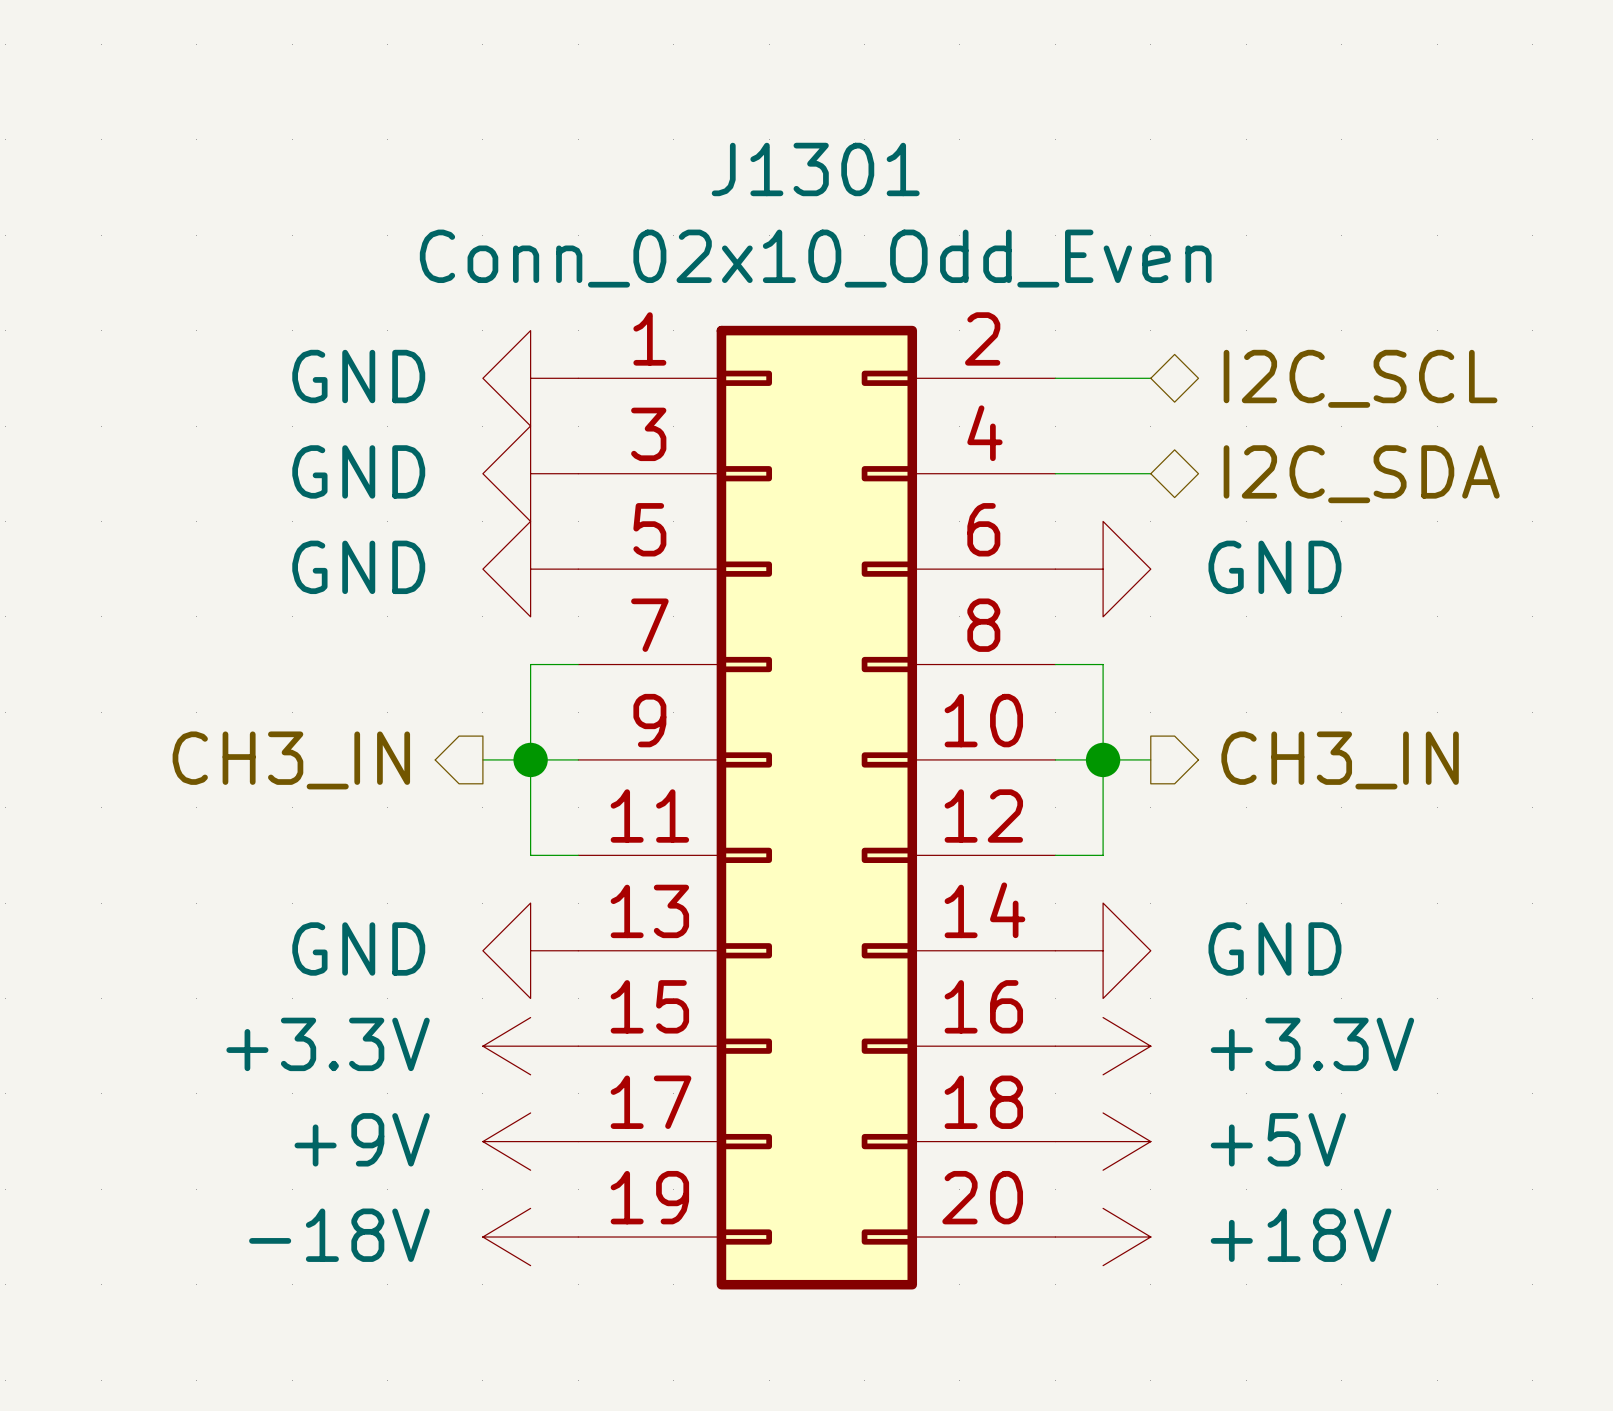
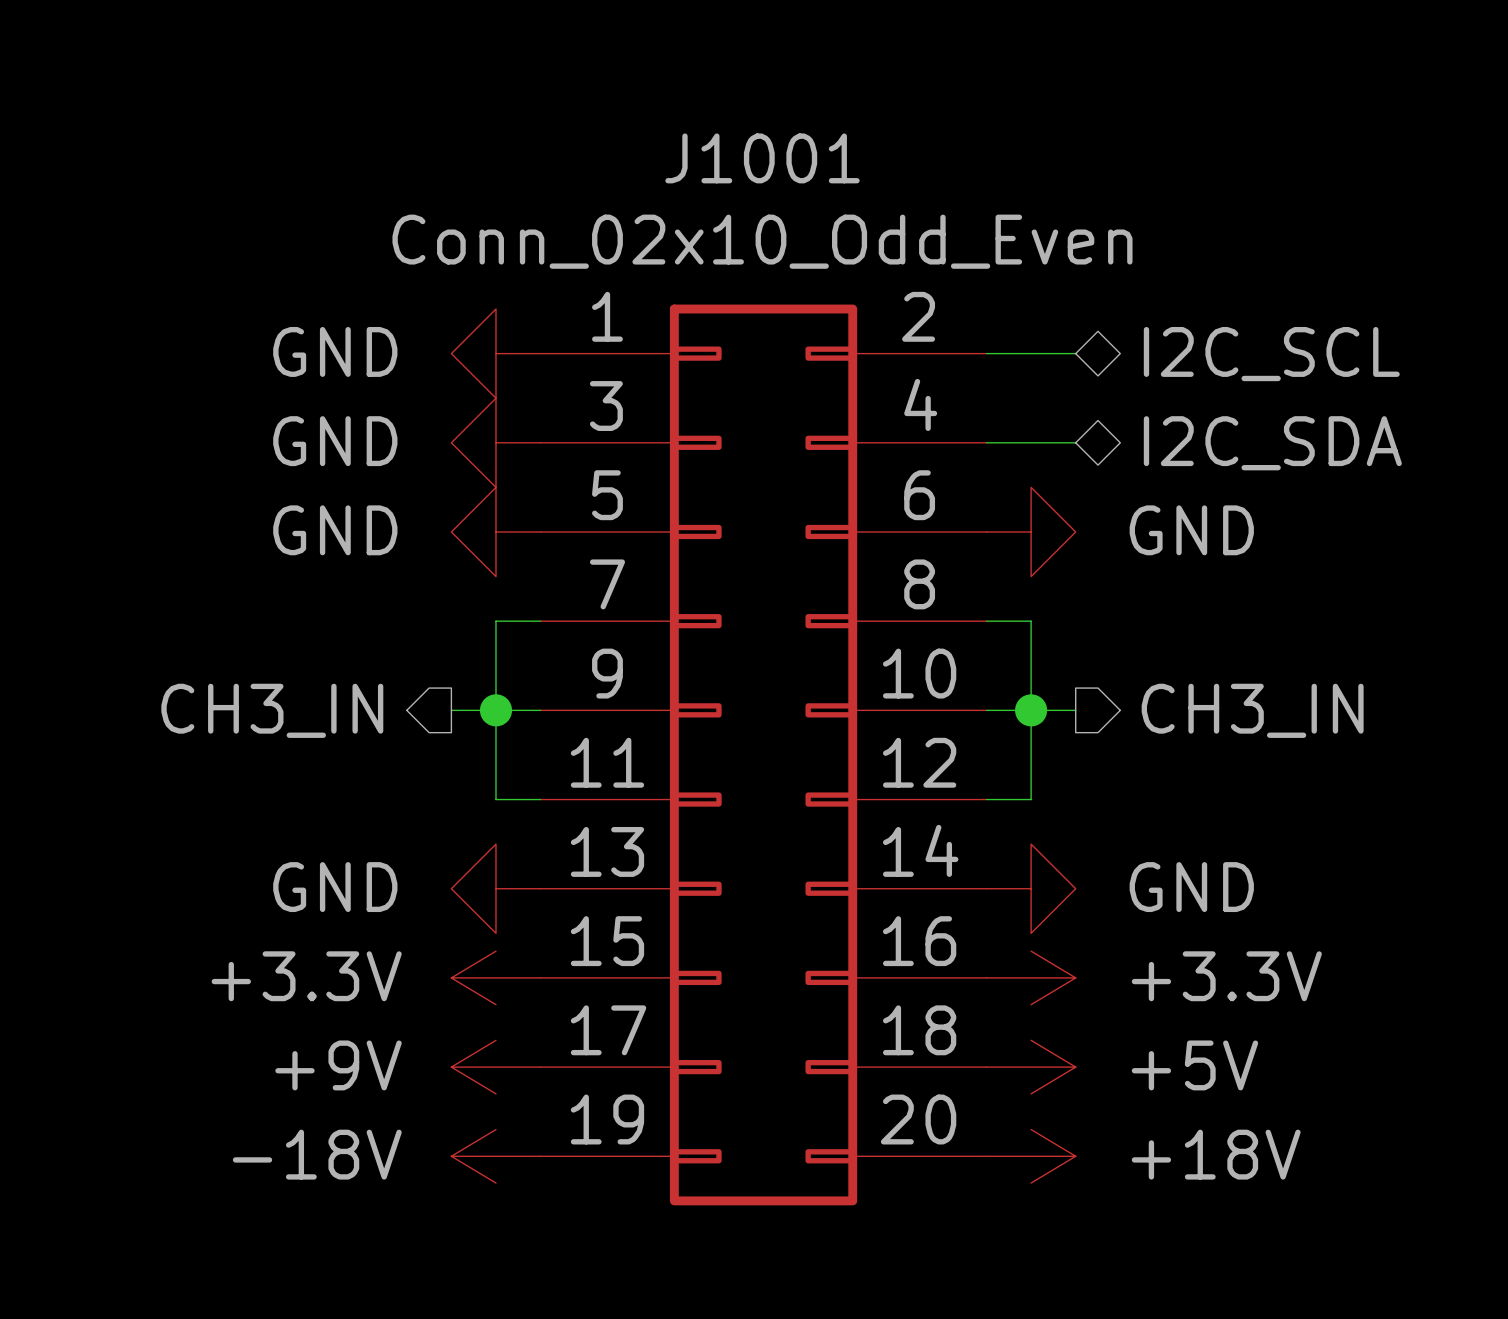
J1301 name: J1301 (815, 169) -> J1001 (762, 158)

